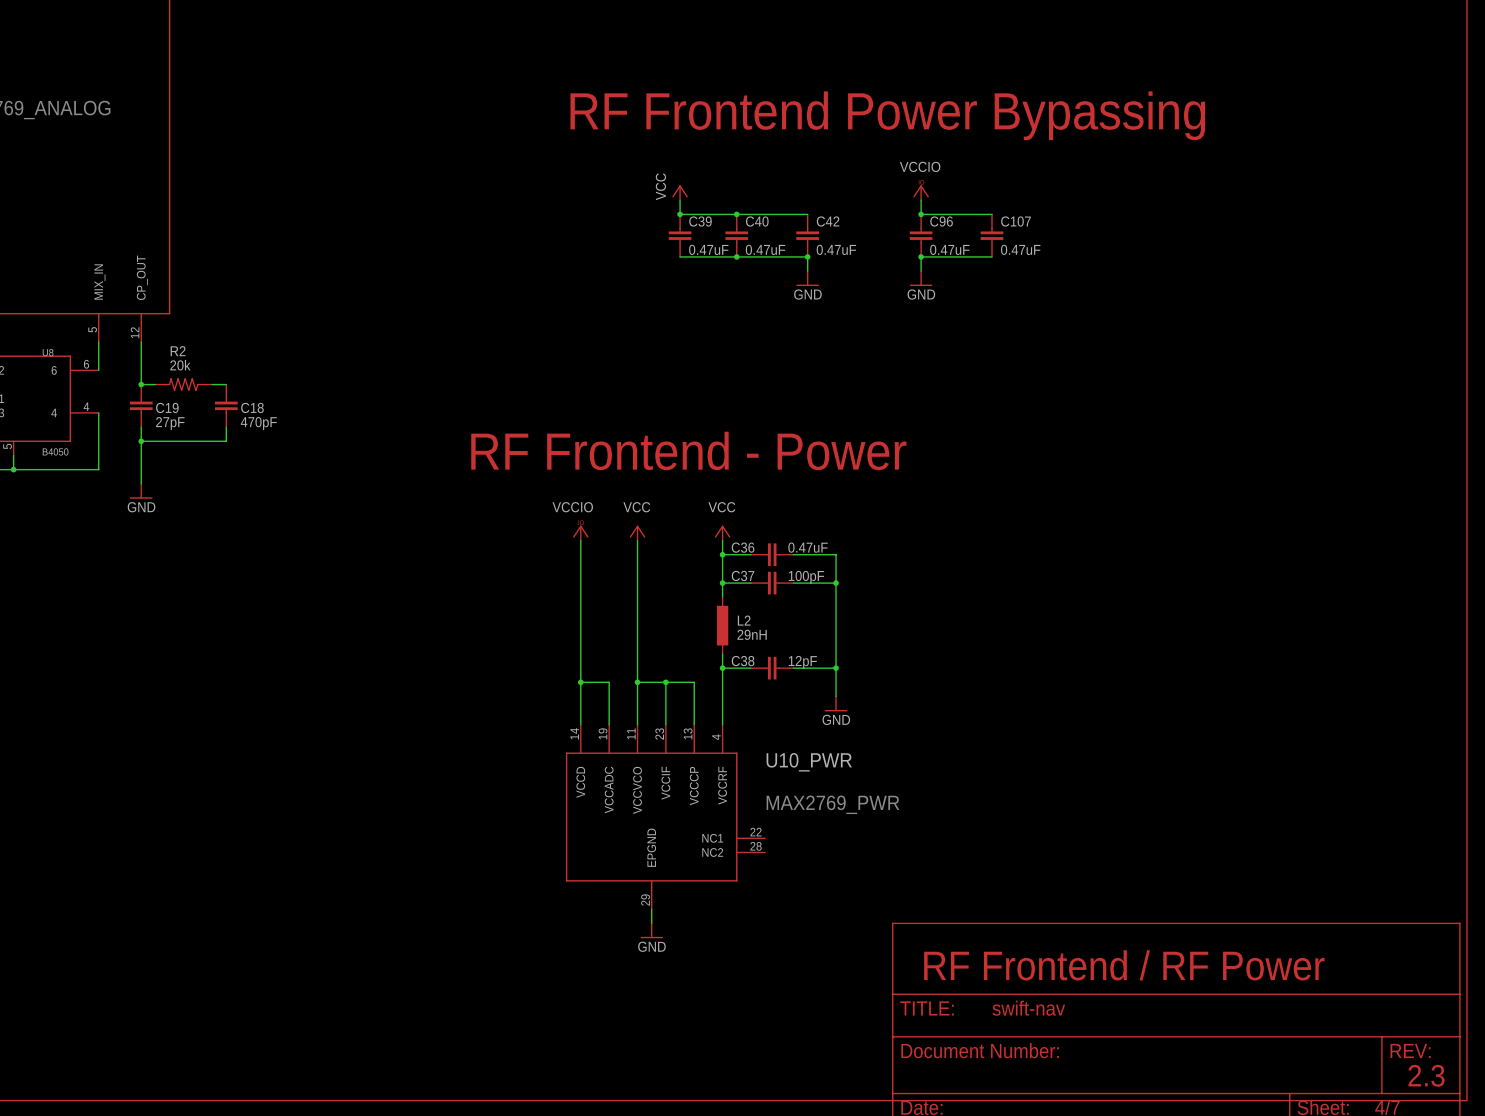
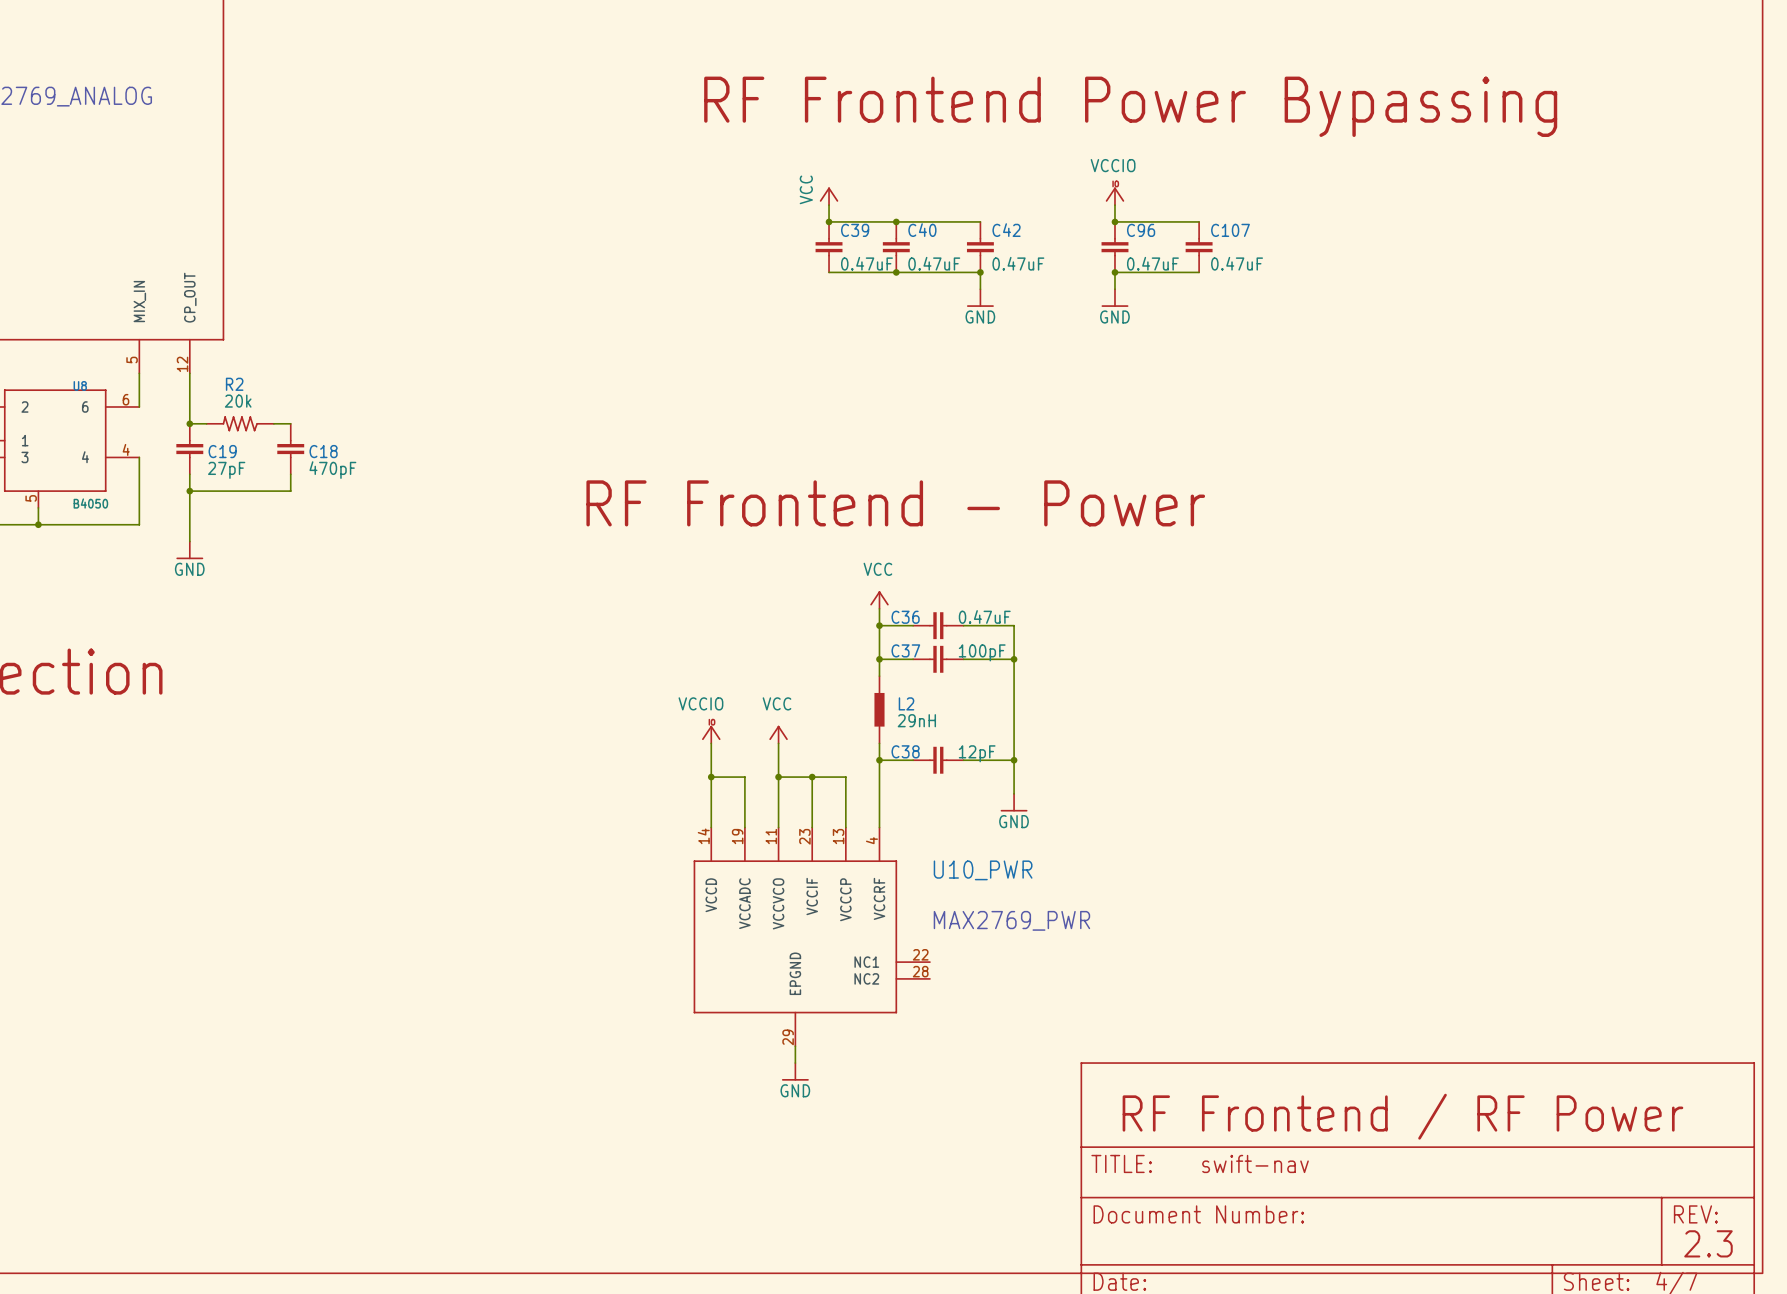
power symbol position: VCCIO (580, 533) -> VCCIO (711, 734)
power symbol position: VCC (637, 533) -> VCC (778, 734)
wire: (580, 540) (580, 653) -> none
wire: (637, 540) (637, 653) -> none
L2 symbol: [716, 597, 729, 654] -> [874, 676, 885, 744]

